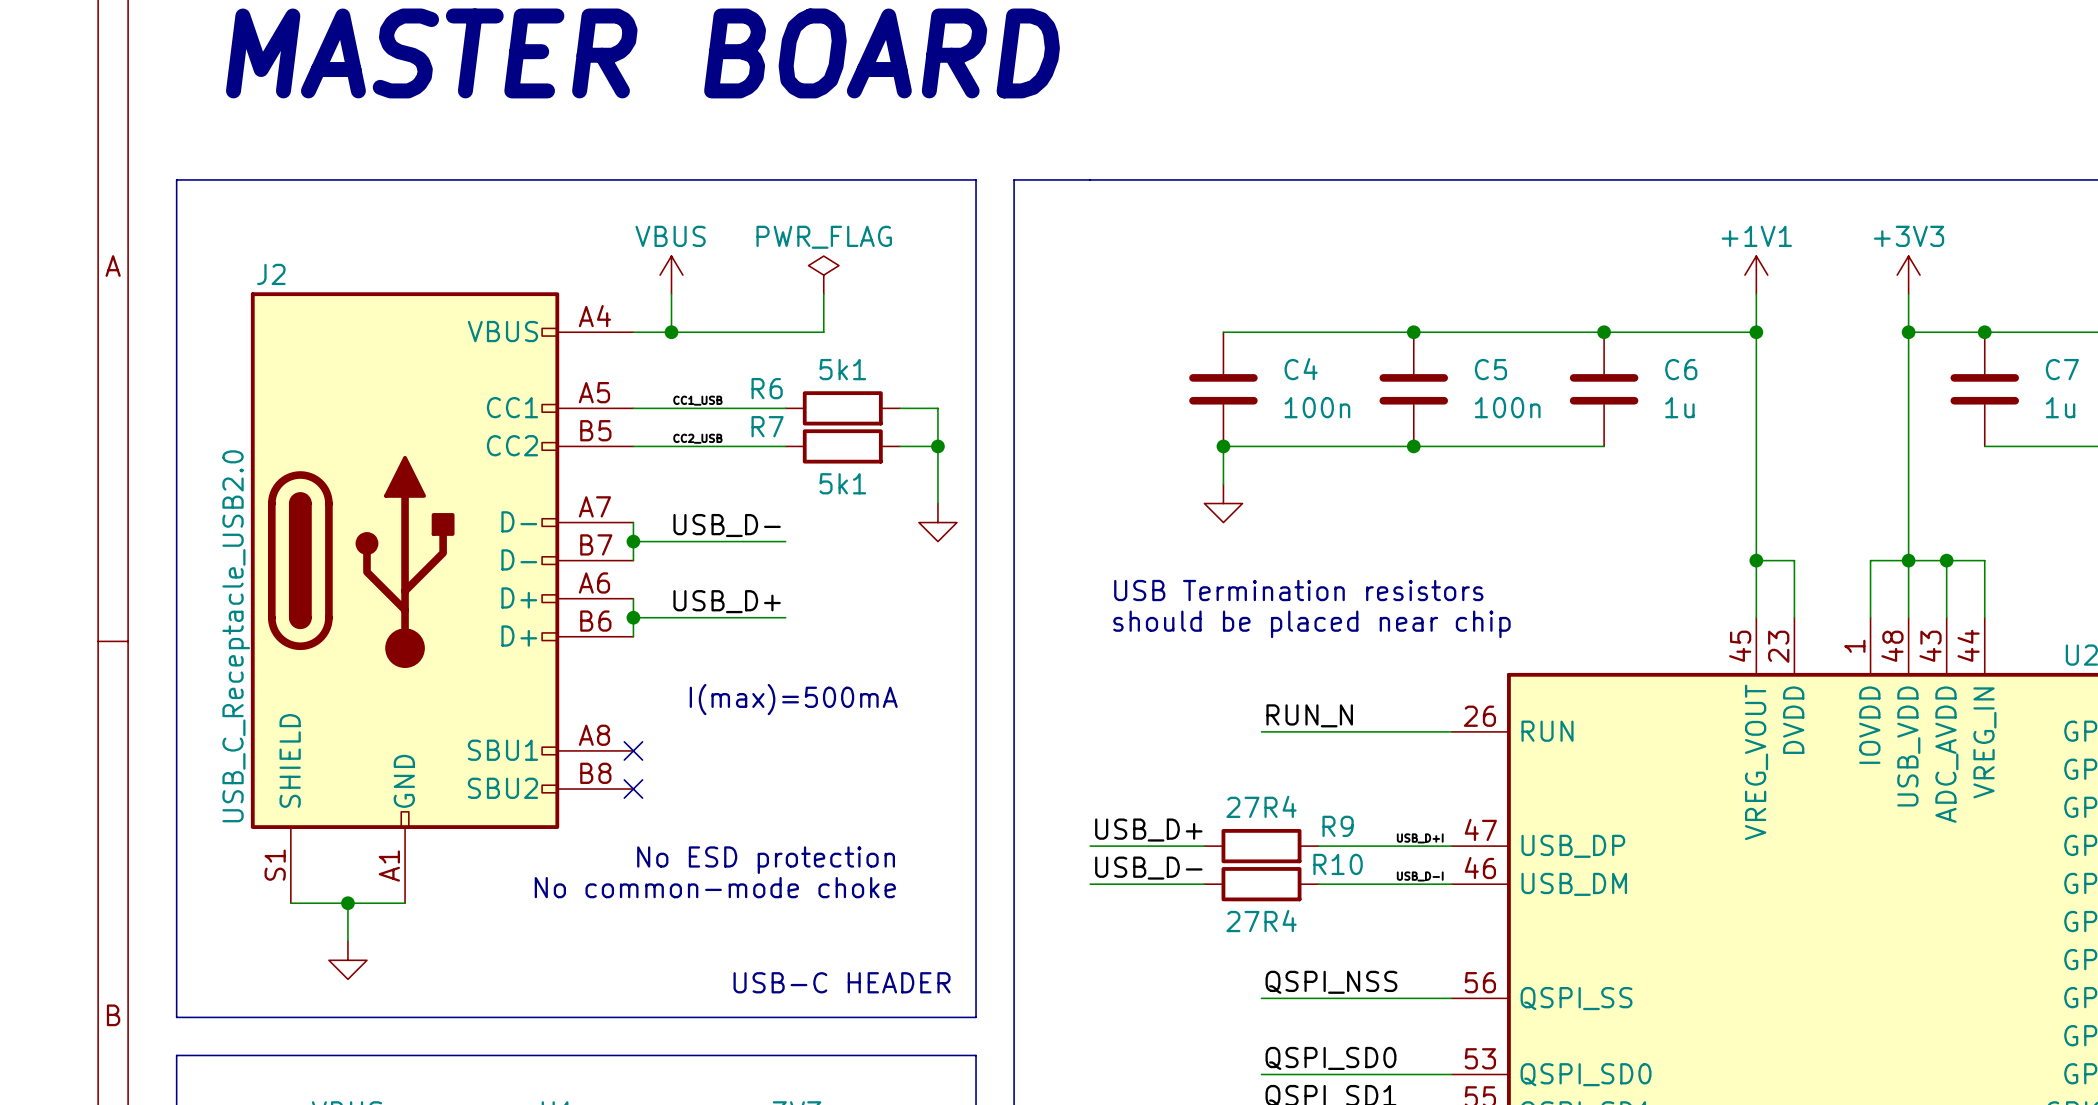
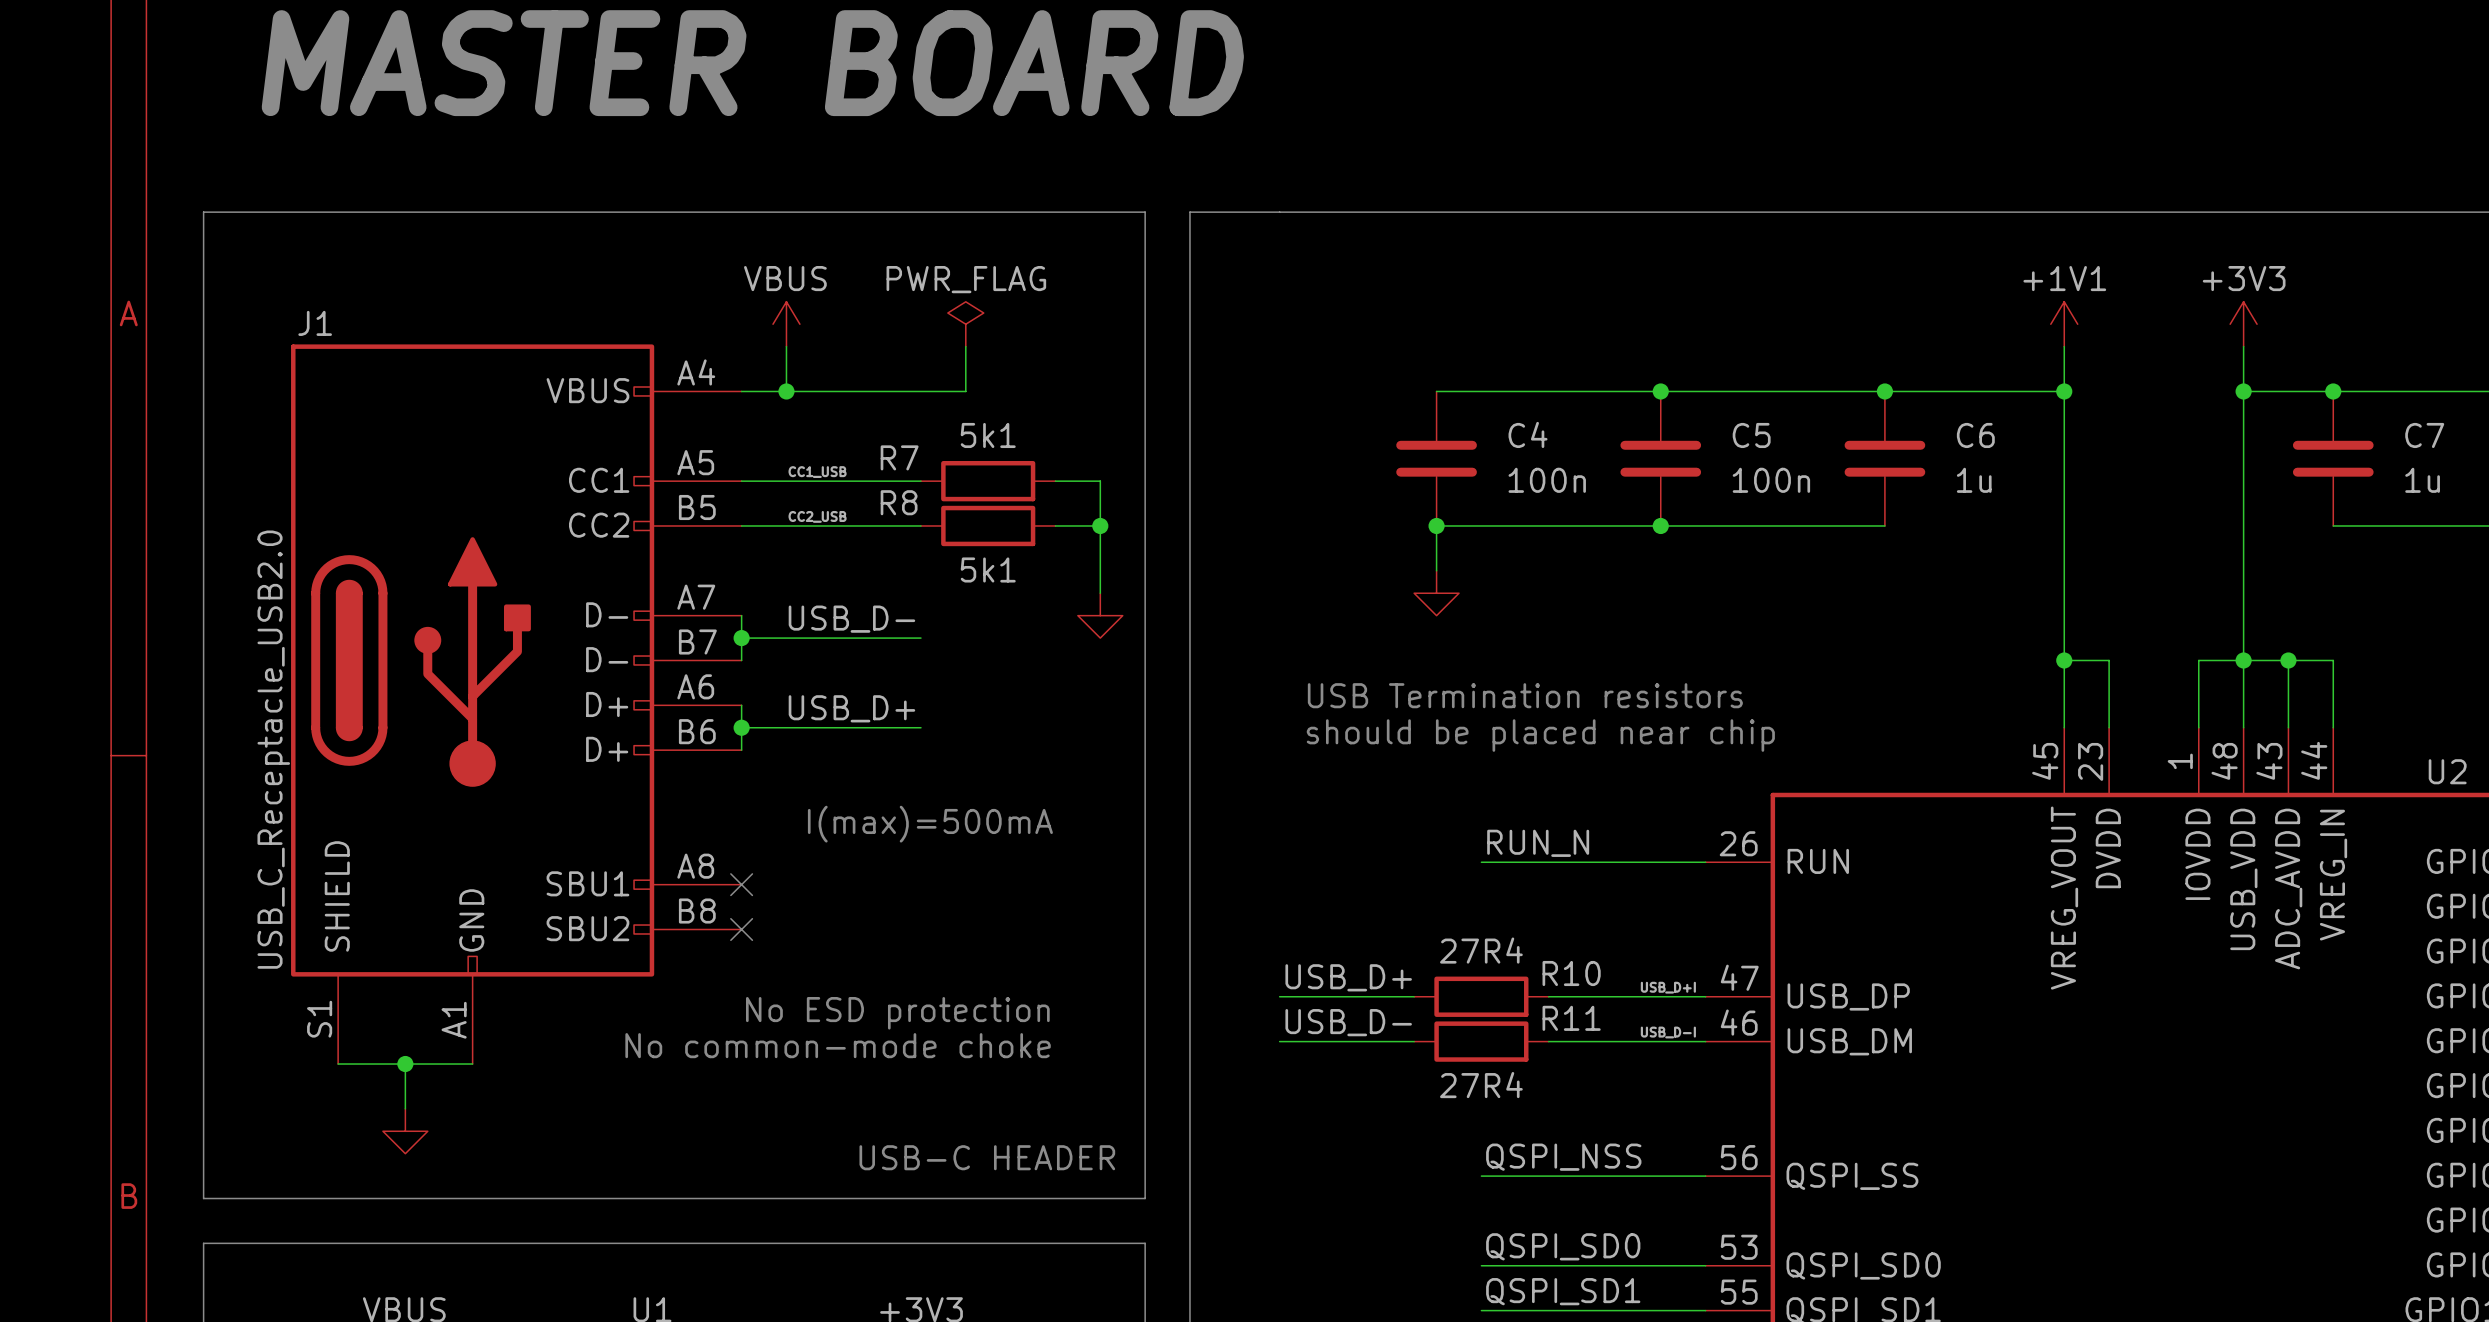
J2 name: J2 (271, 274) -> J1 (315, 323)
R6 name: R6 (767, 388) -> R7 (899, 457)
R7 name: R7 (767, 426) -> R8 (899, 502)
R9 name: R9 (1338, 826) -> R10 (1571, 973)
R10 name: R10 (1338, 864) -> R11 (1571, 1018)

